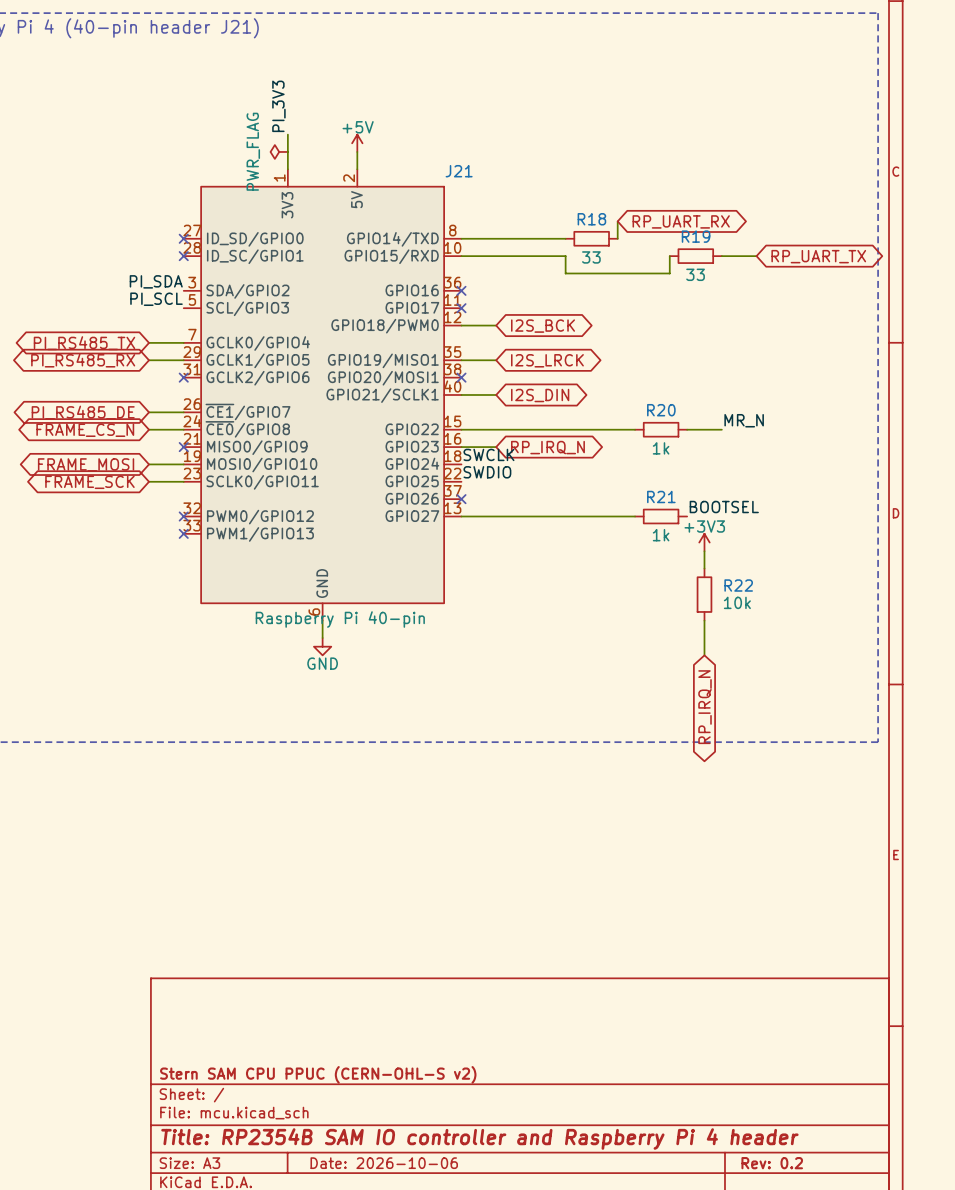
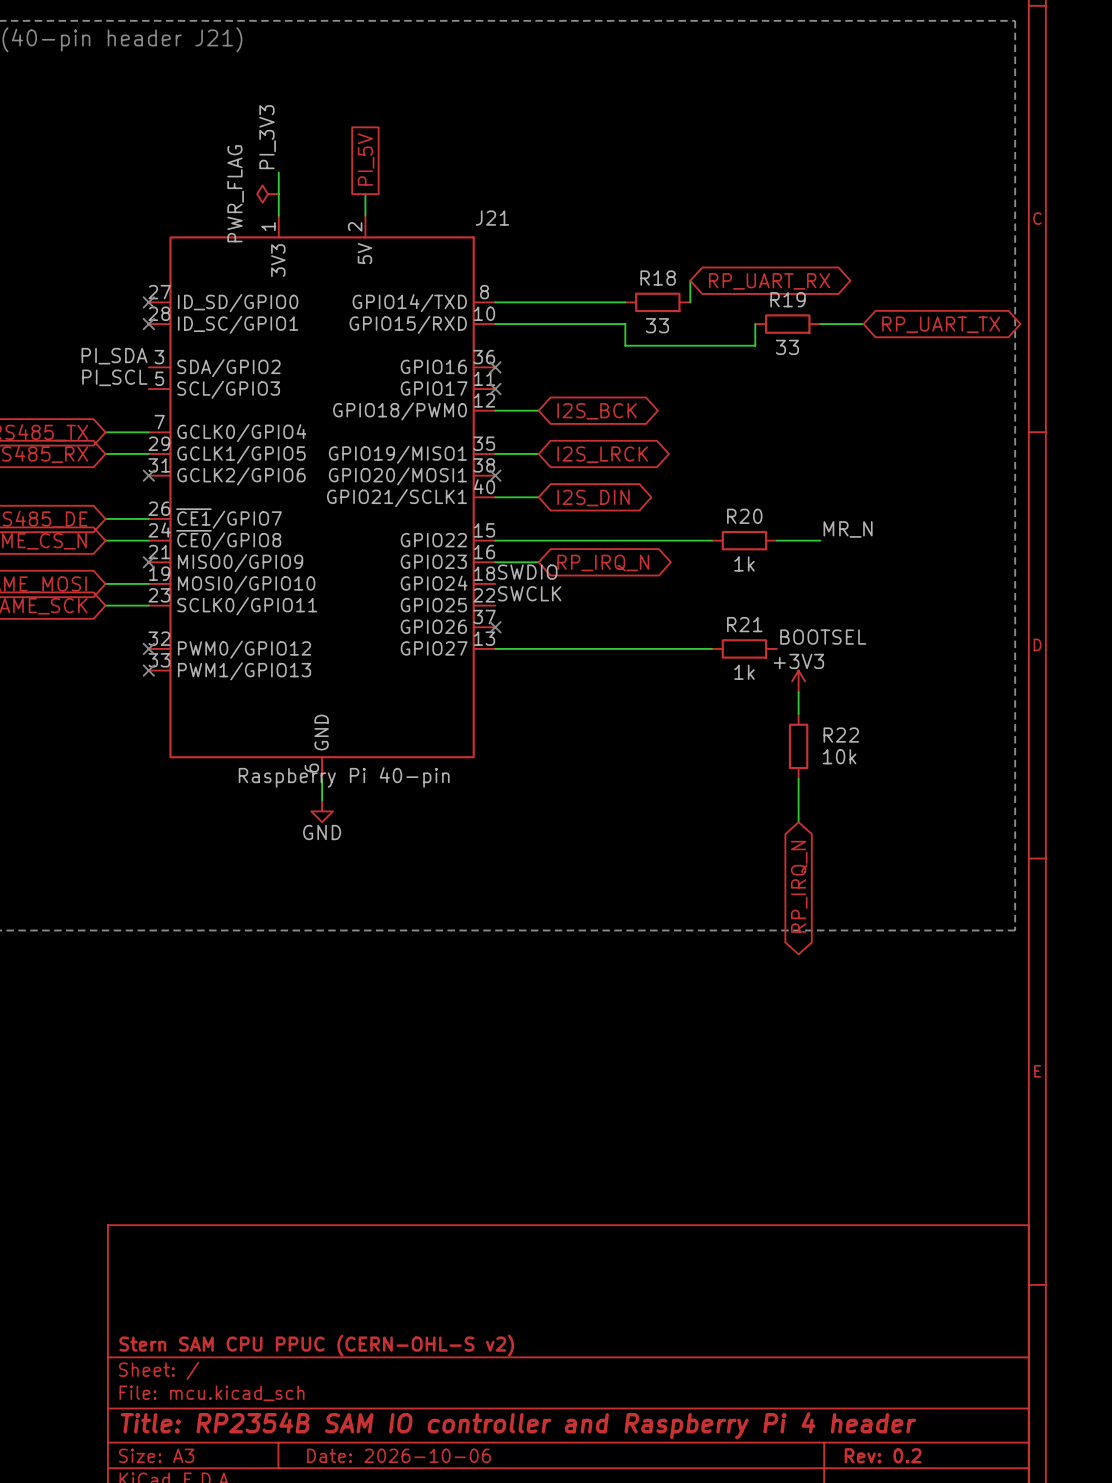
global label: none -> PI_5V (366, 159)
power symbol: +5V (357, 143) -> none
label: SWCLK (488, 454) -> SWDIO (527, 572)
label: SWDIO (487, 472) -> SWCLK (529, 593)

